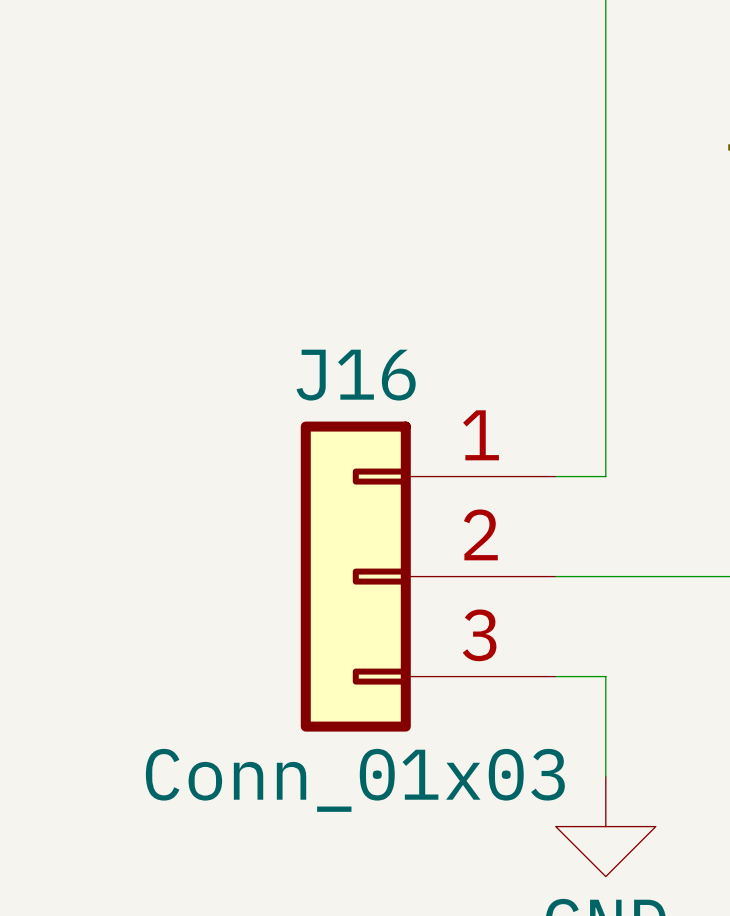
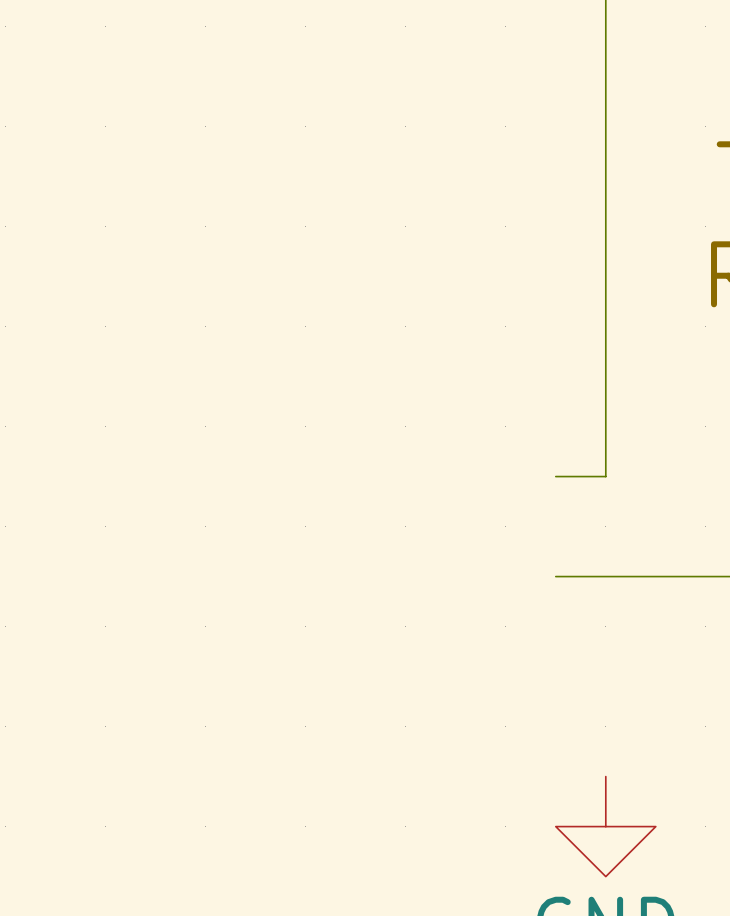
J16: Conn_01x03 (428, 576) -> none
wire: (555, 676) (605, 676) (605, 776) -> none

